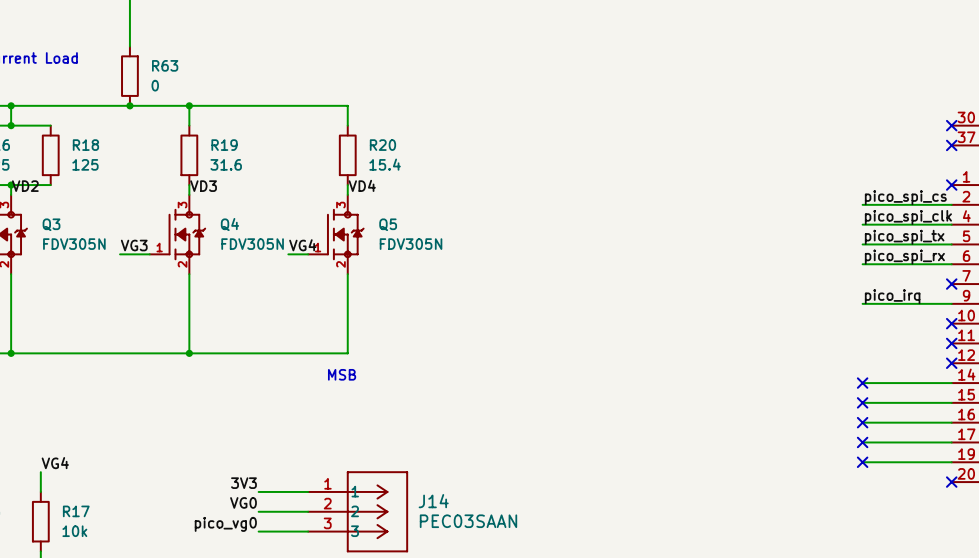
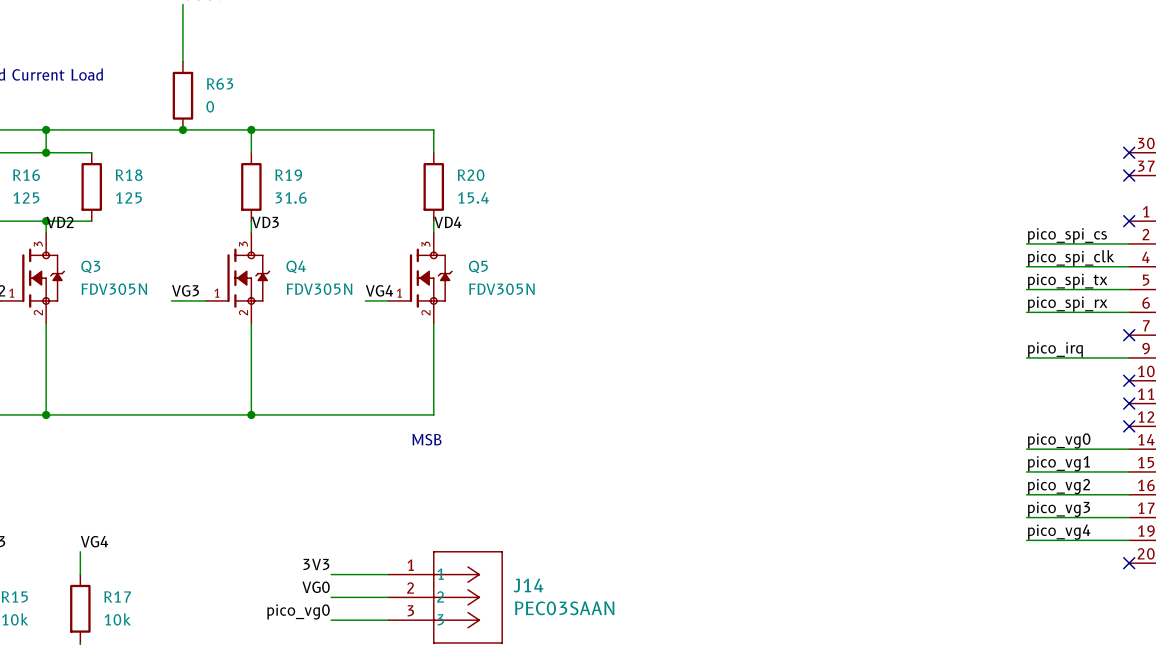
label: none -> pico_vg0 (1059, 440)
no-connect mark: (862, 383) -> none
label: none -> pico_vg1 (1059, 463)
no-connect mark: (862, 402) -> none
label: none -> pico_vg2 (1059, 486)
no-connect mark: (862, 422) -> none
label: none -> pico_vg3 (1059, 509)
no-connect mark: (862, 442) -> none
label: none -> pico_vg4 (1059, 532)
no-connect mark: (862, 462) -> none

